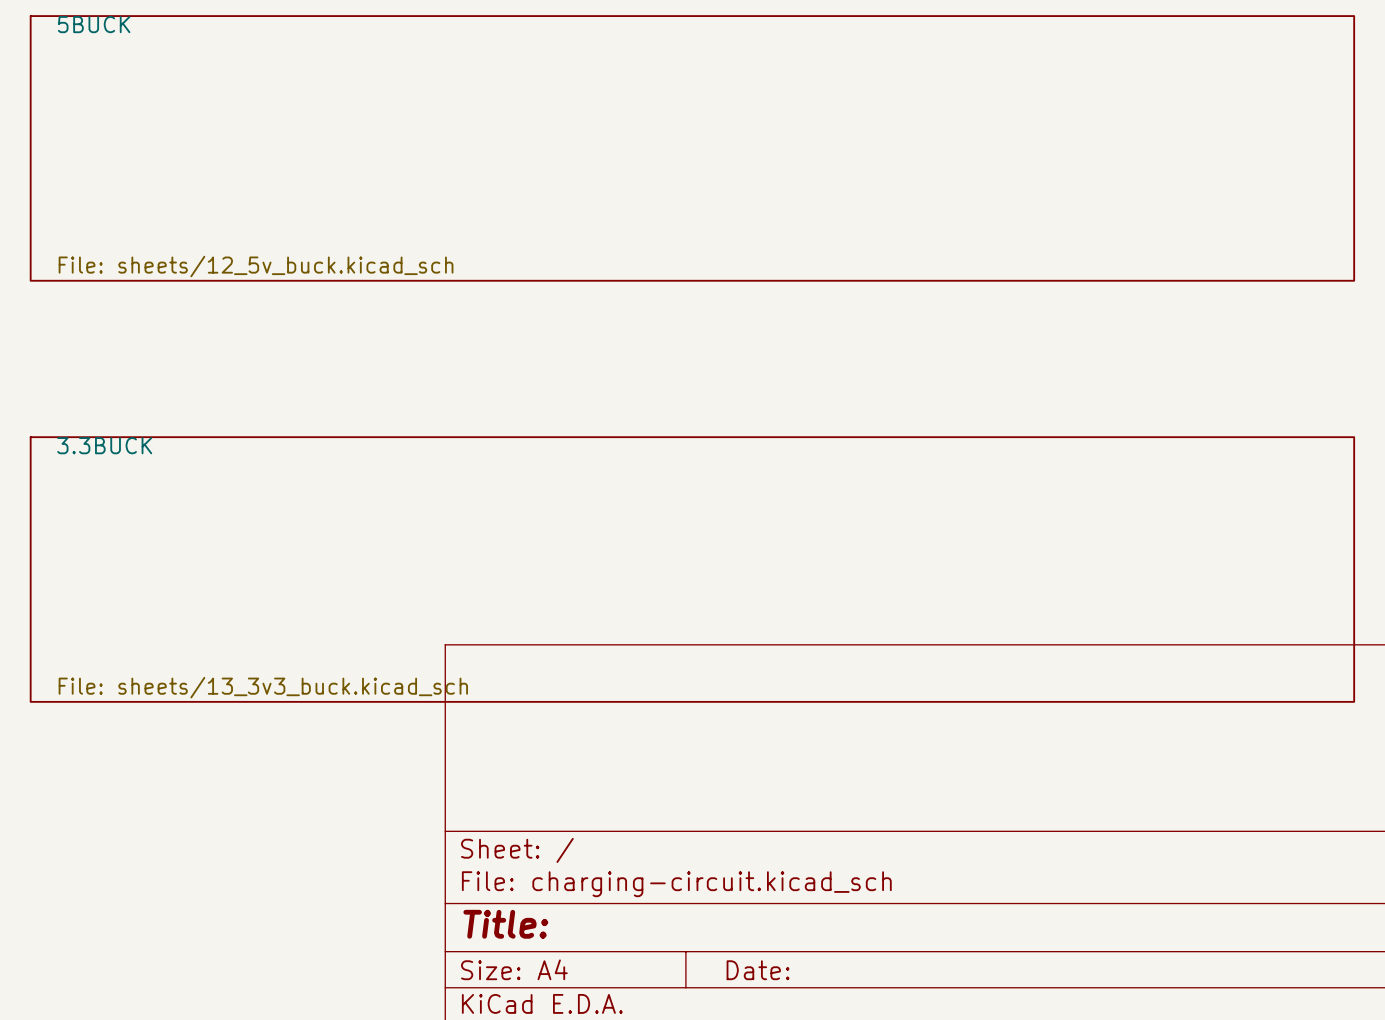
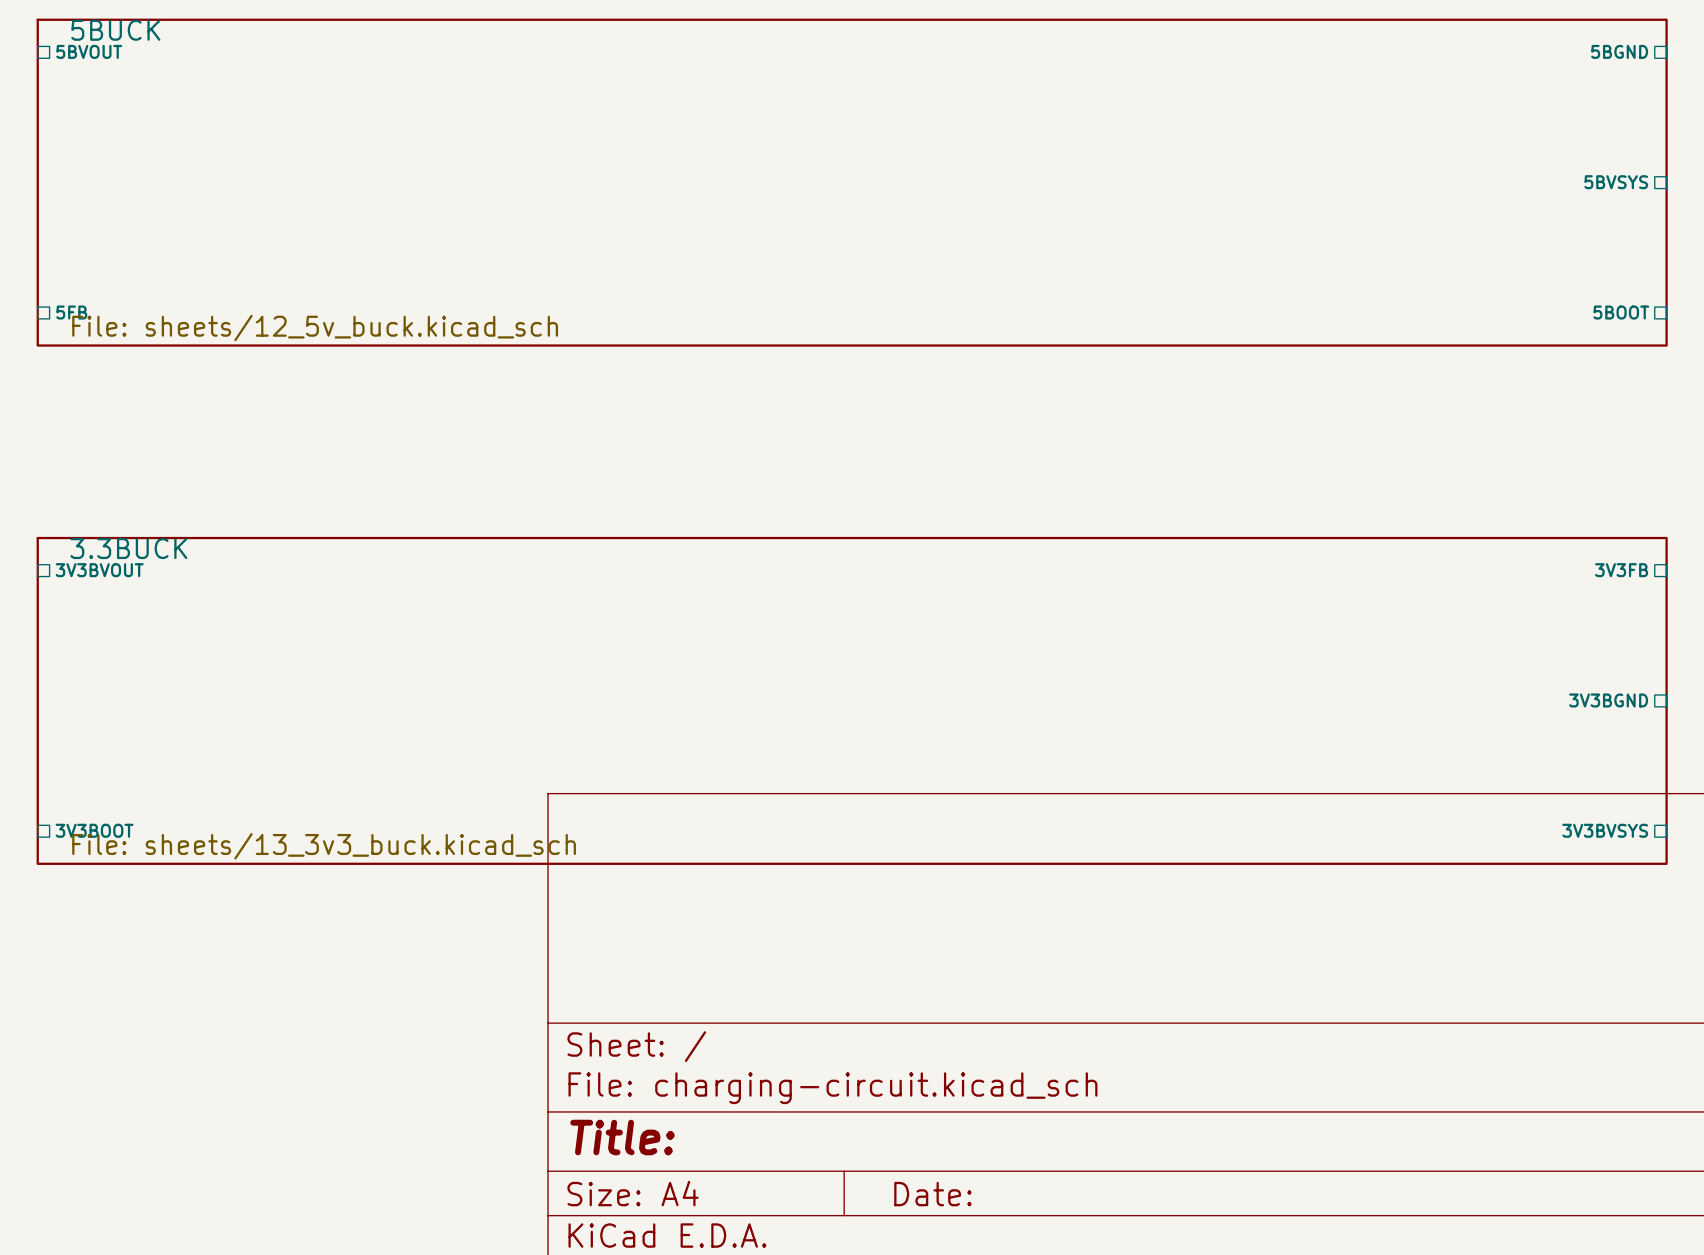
sheet pin: none -> 5BVOUT (89, 51)
sheet pin: none -> 5BGND (1619, 51)
sheet pin: none -> 5BVSYS (1616, 182)
sheet pin: none -> 5FB (71, 312)
sheet pin: none -> 5BOOT (1621, 312)
sheet pin: none -> 3V3BVOUT (99, 570)
sheet pin: none -> 3V3FB (1621, 570)
sheet pin: none -> 3V3BGND (1608, 700)
sheet pin: none -> 3V3BOOT (94, 830)
sheet pin: none -> 3V3BVSYS (1605, 830)

